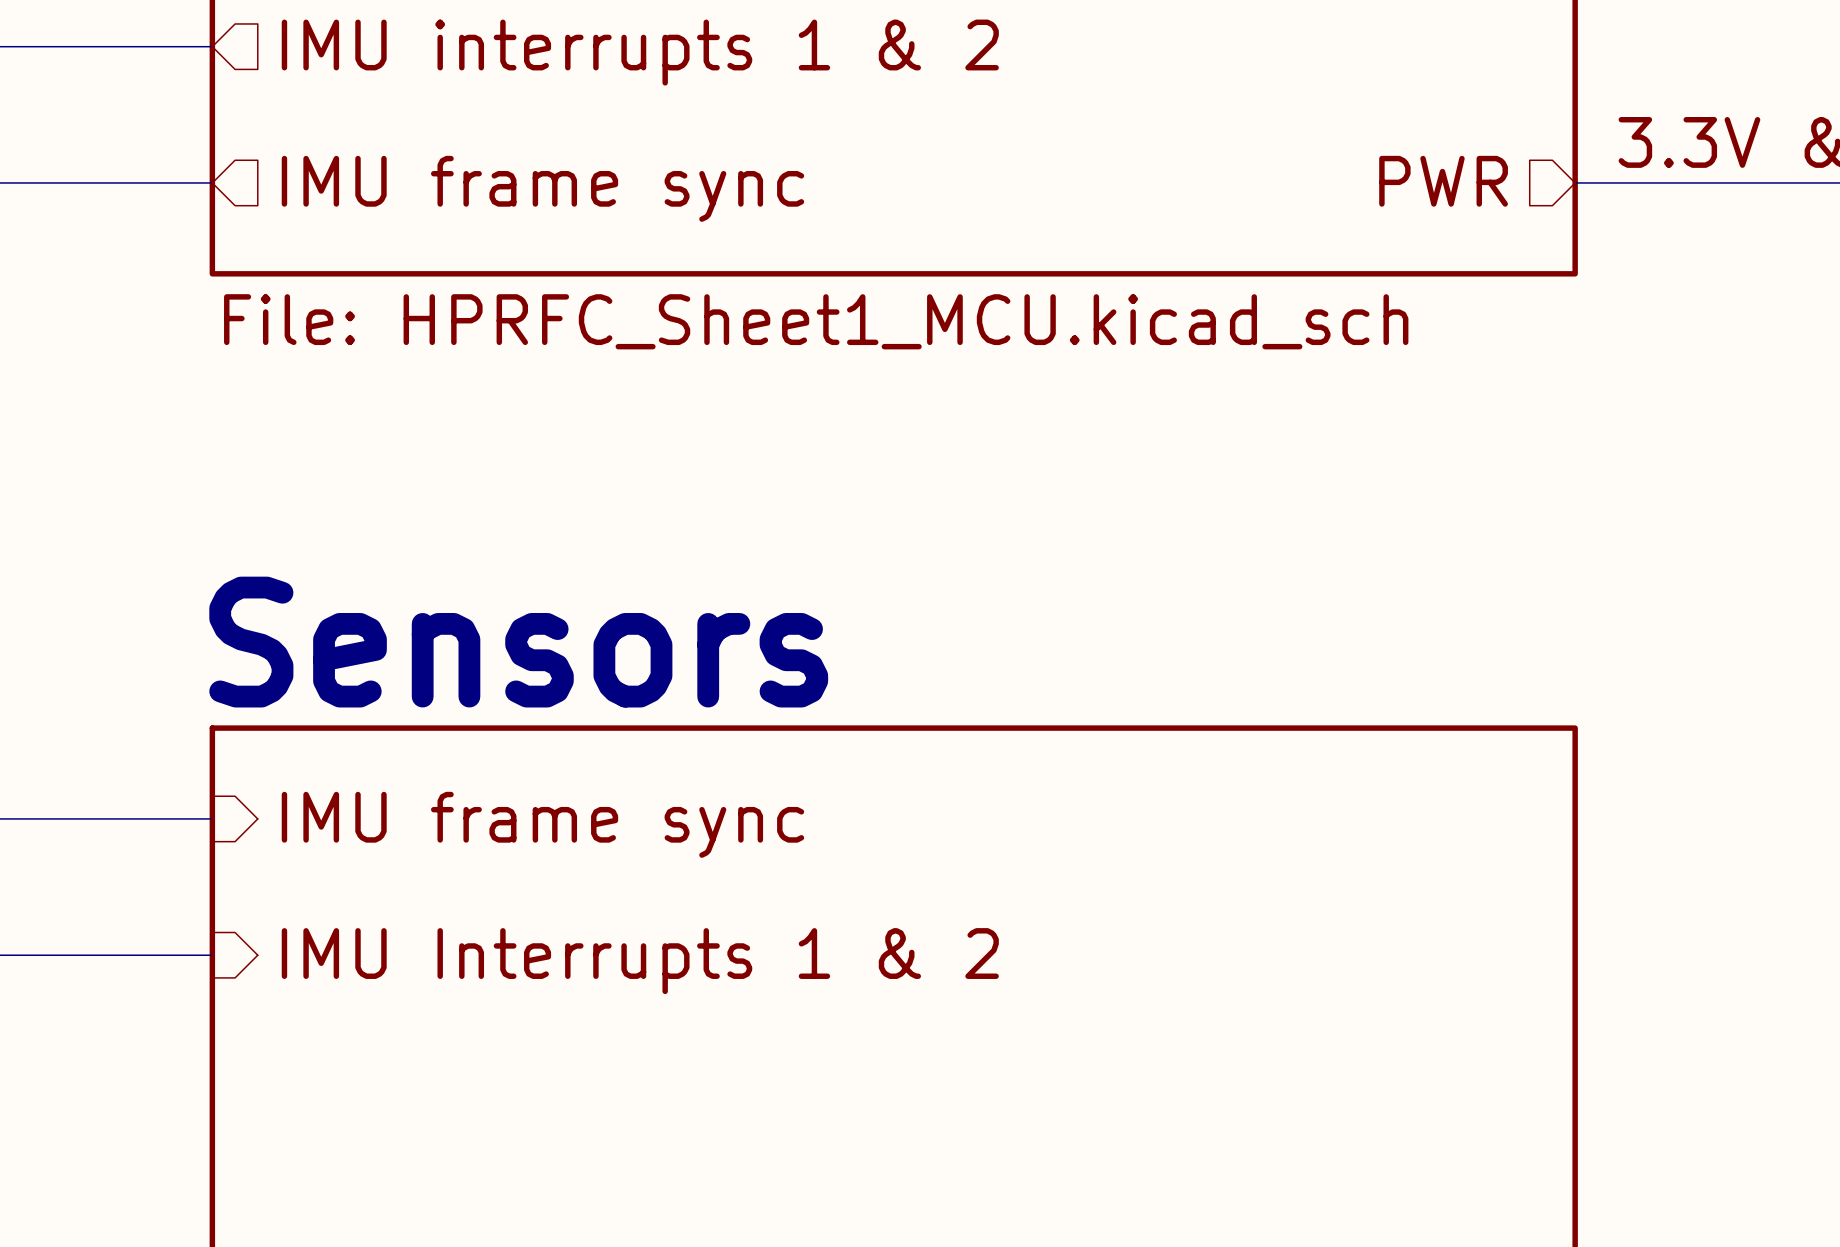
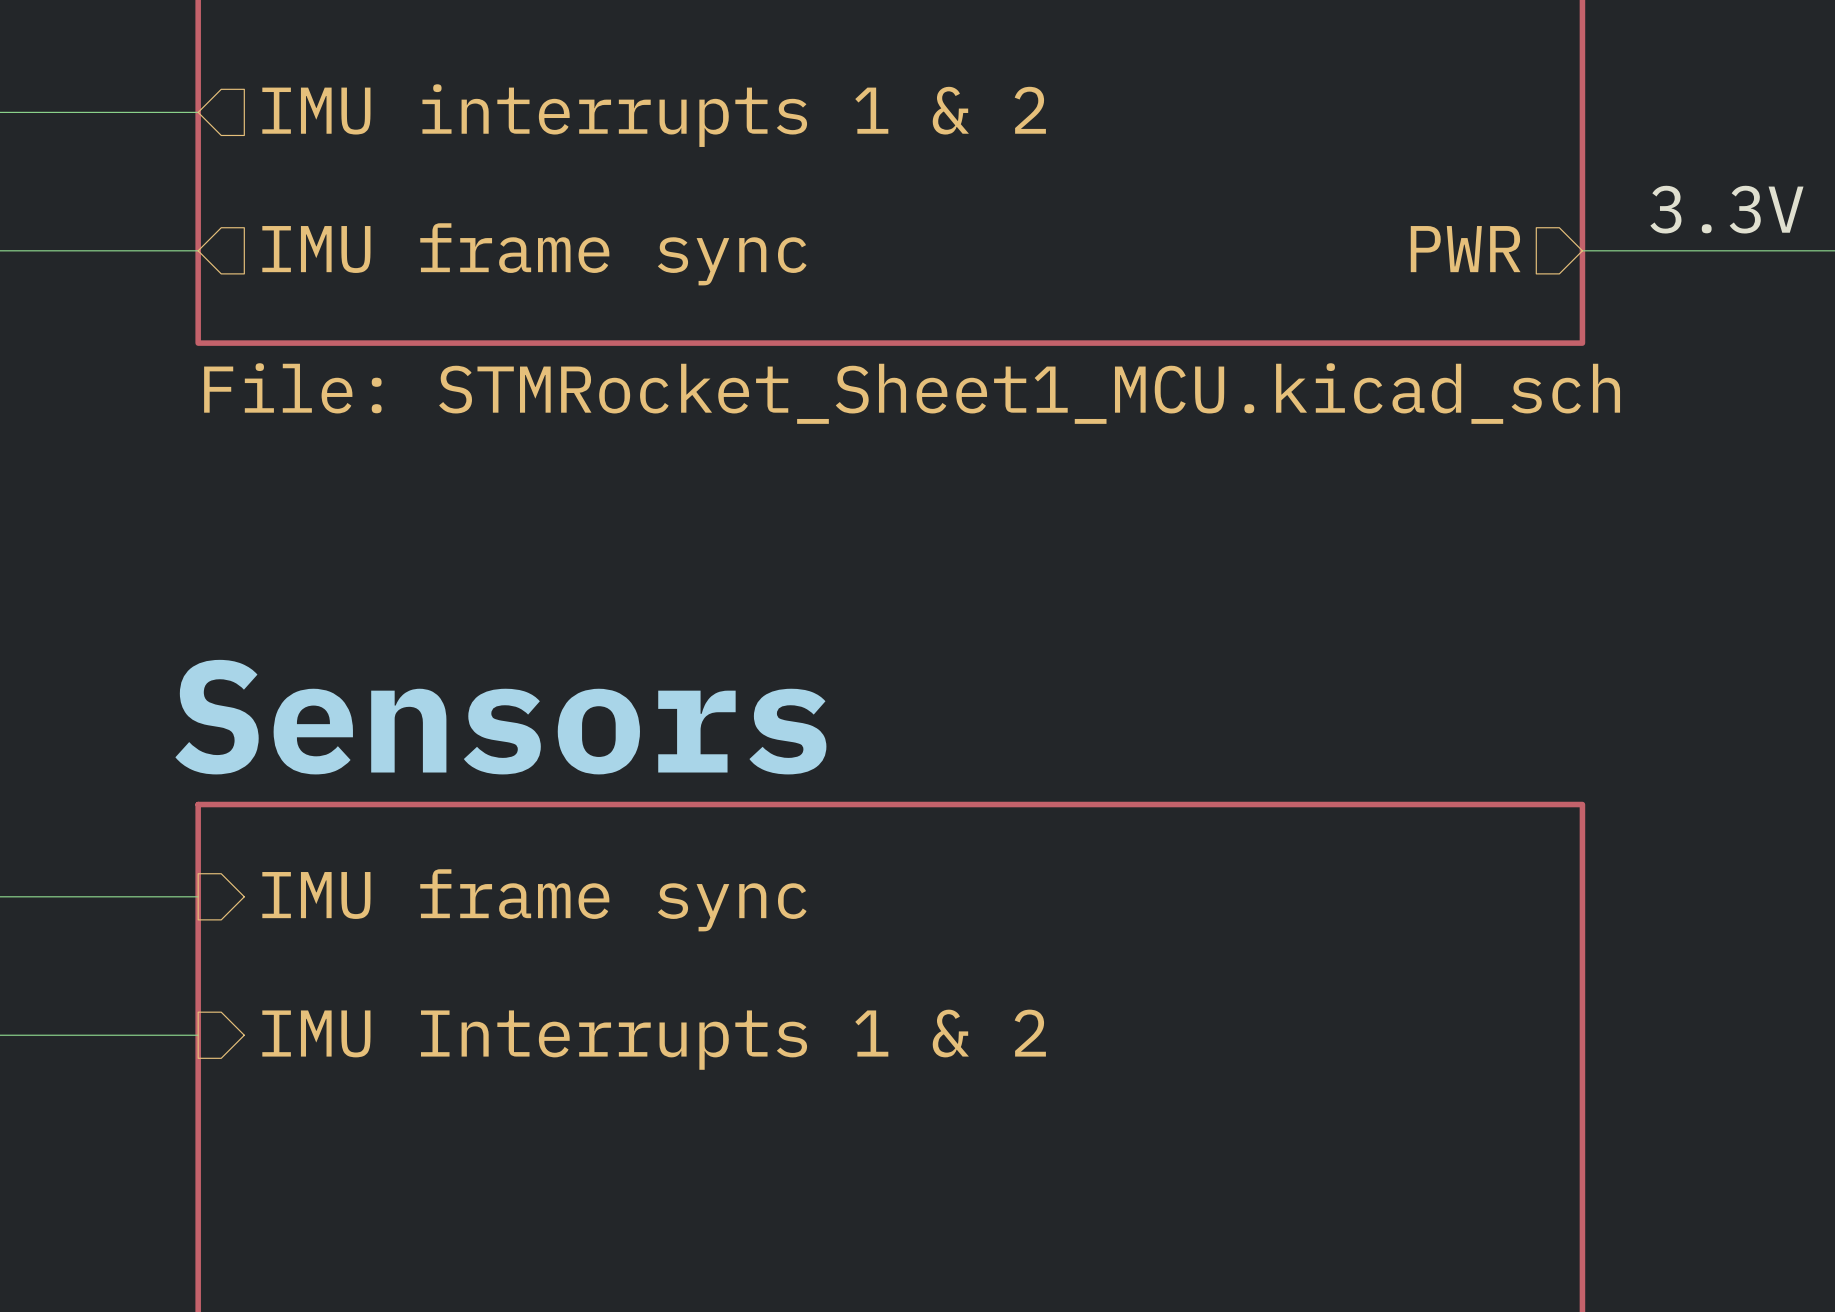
sheet value: File: HPRFC_Sheet1_MCU.kicad_sch (816, 321) -> File: STMRocket_Sheet1_MCU.kicad_sch (912, 393)

